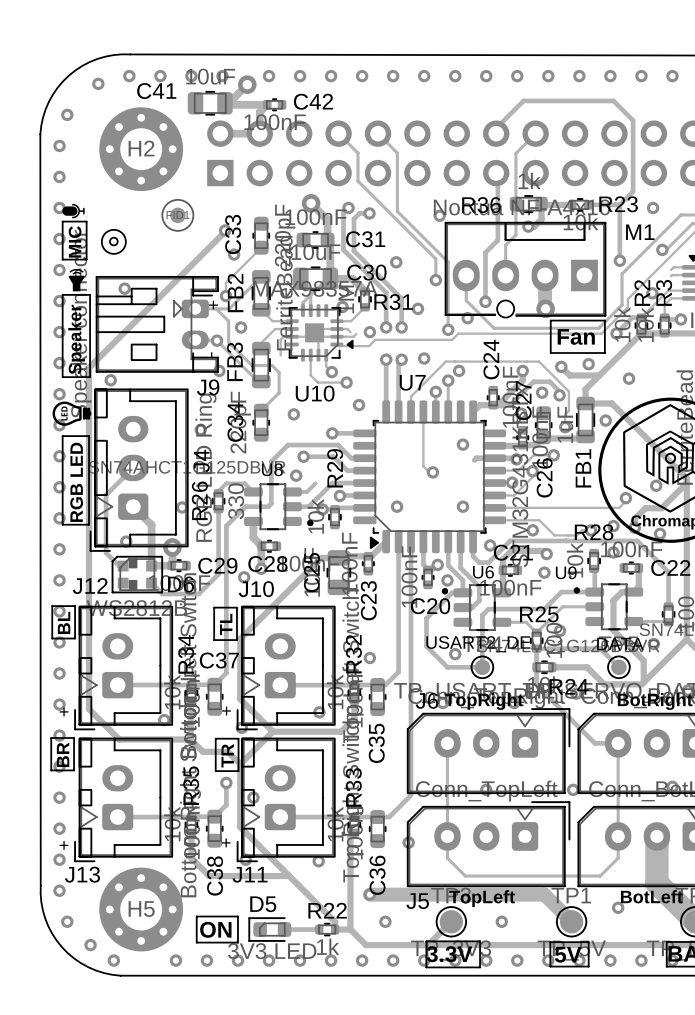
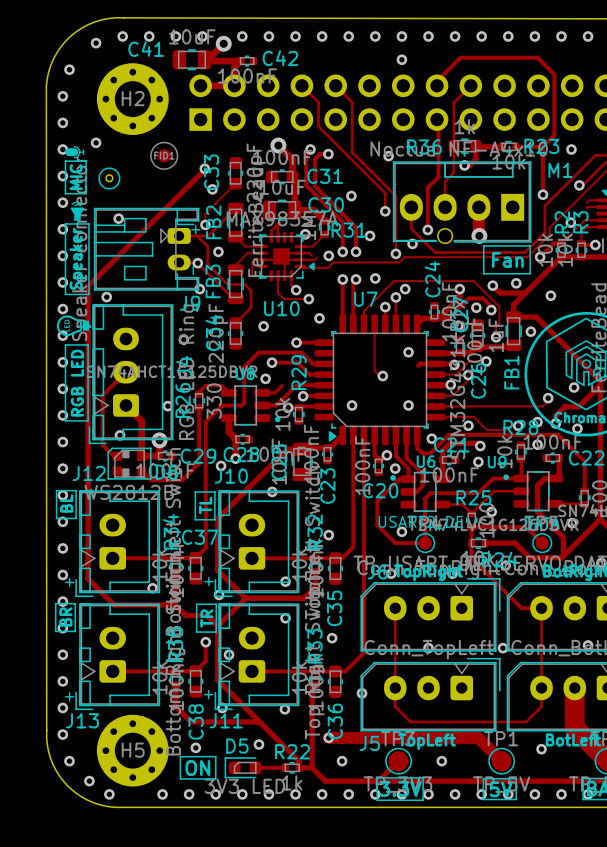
via: none -> (401, 59)
via: none -> (96, 142)
via: none -> (272, 491)
via: none -> (285, 618)
via: none -> (332, 638)
via: none -> (258, 744)
via: none -> (195, 747)

